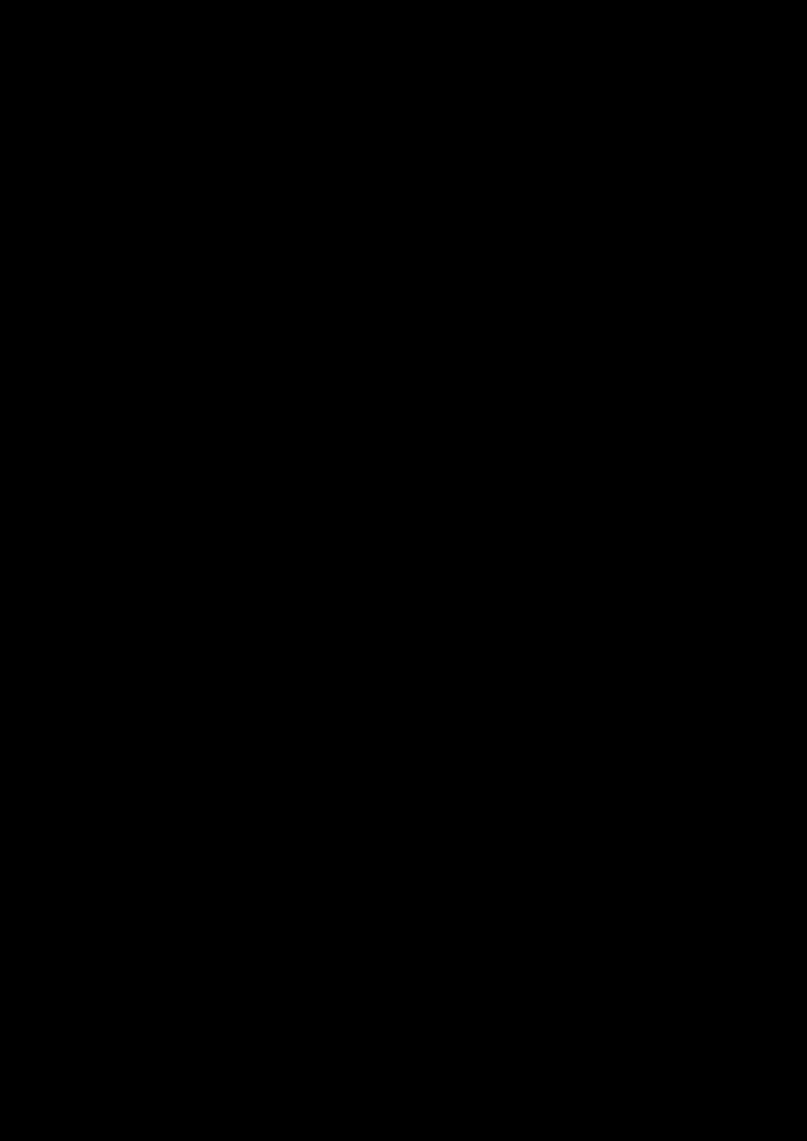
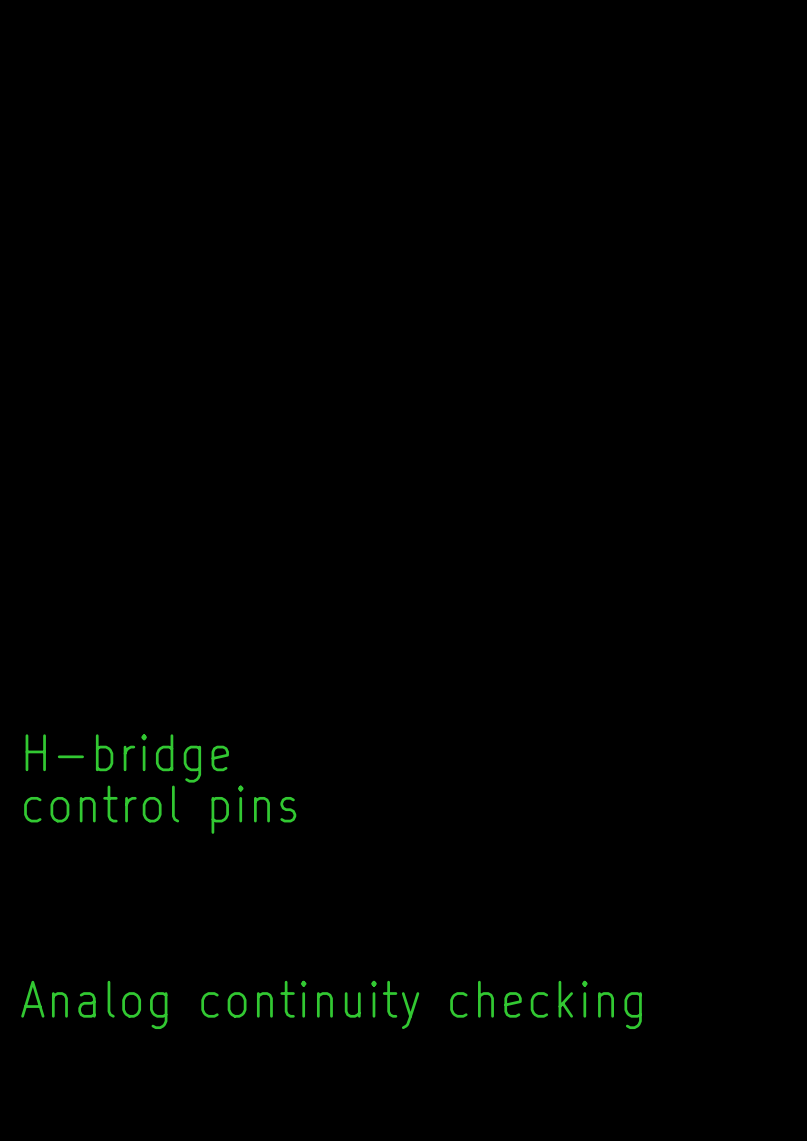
text: none -> H-bridge (127, 758)
text: none -> control pins (160, 809)
text: none -> Analog continuity checking (331, 1004)

